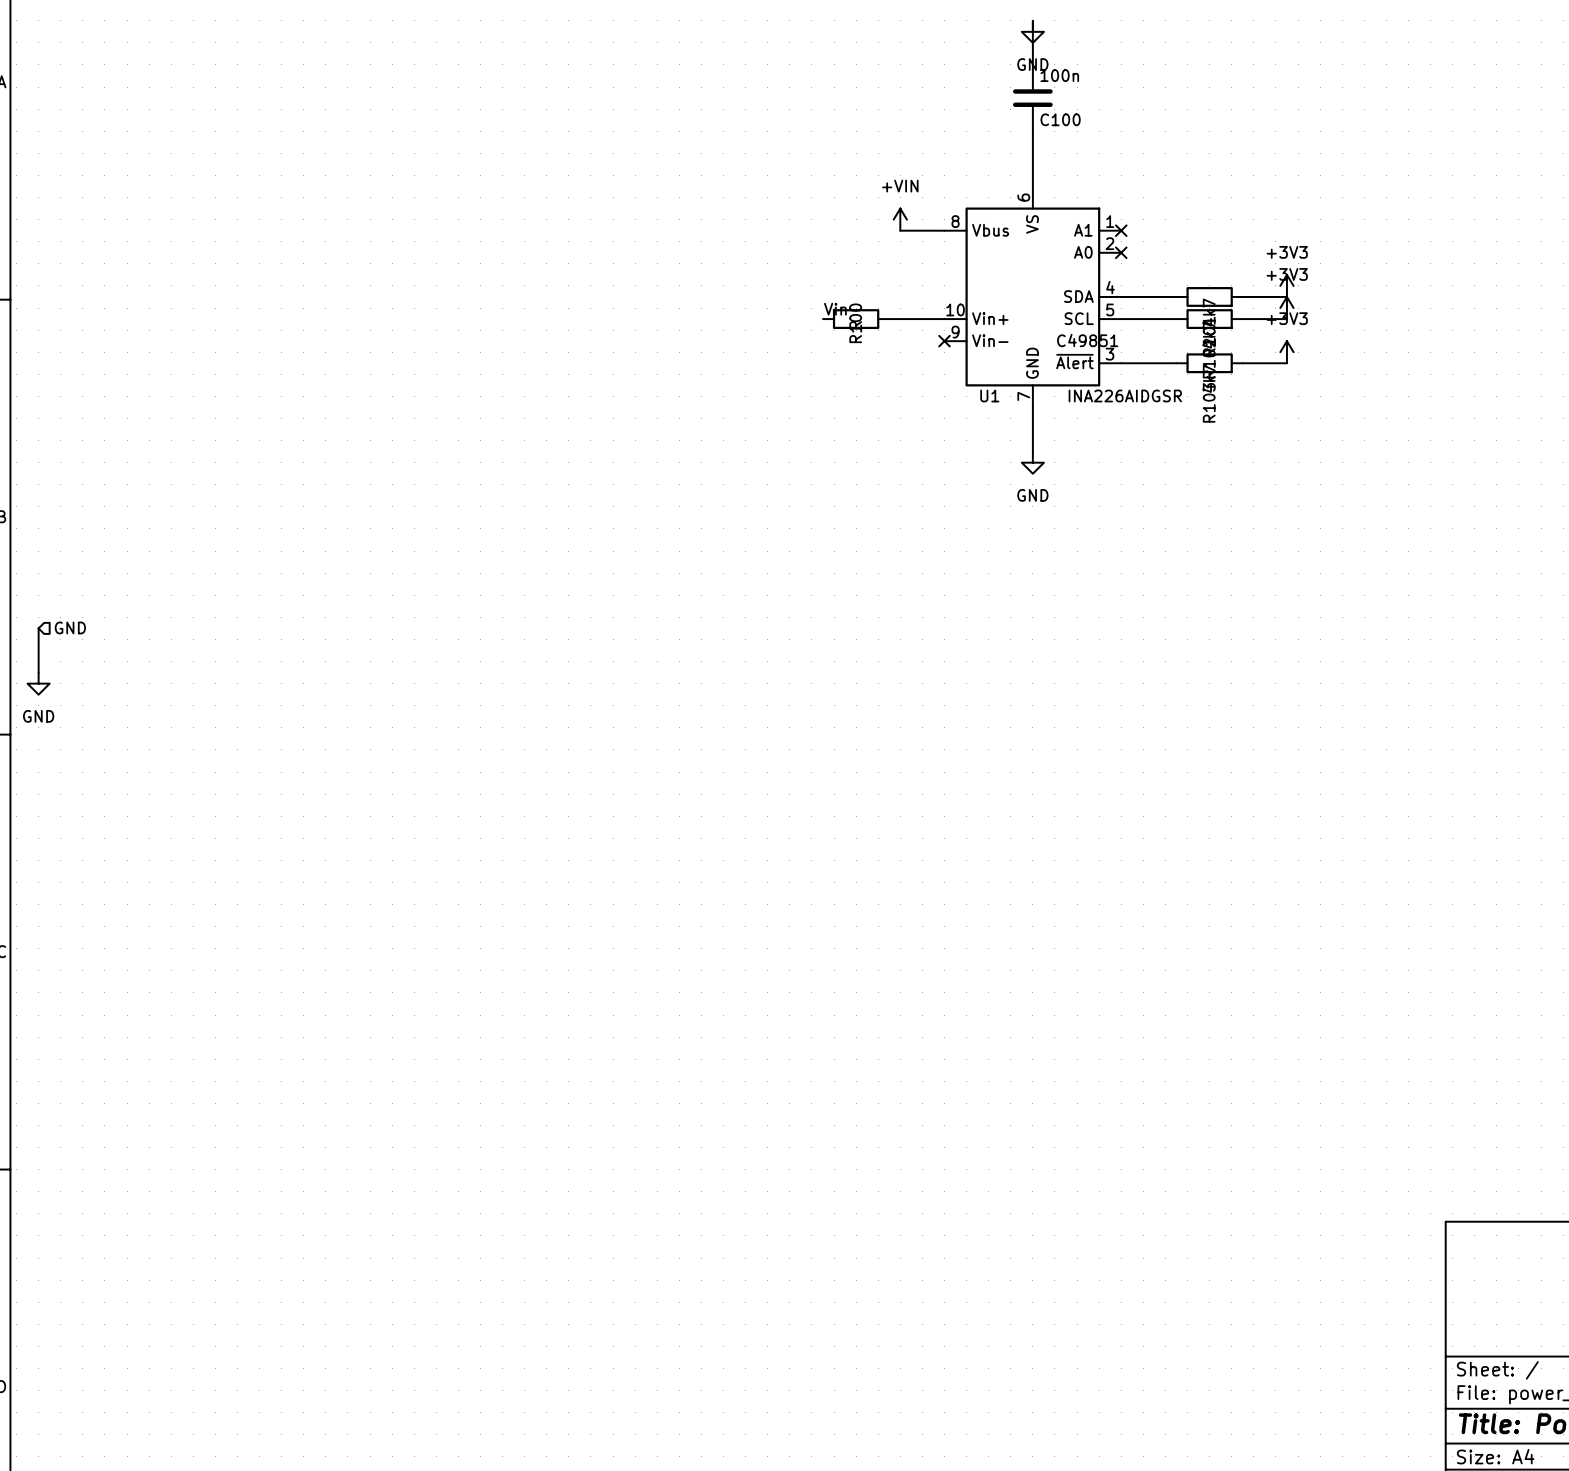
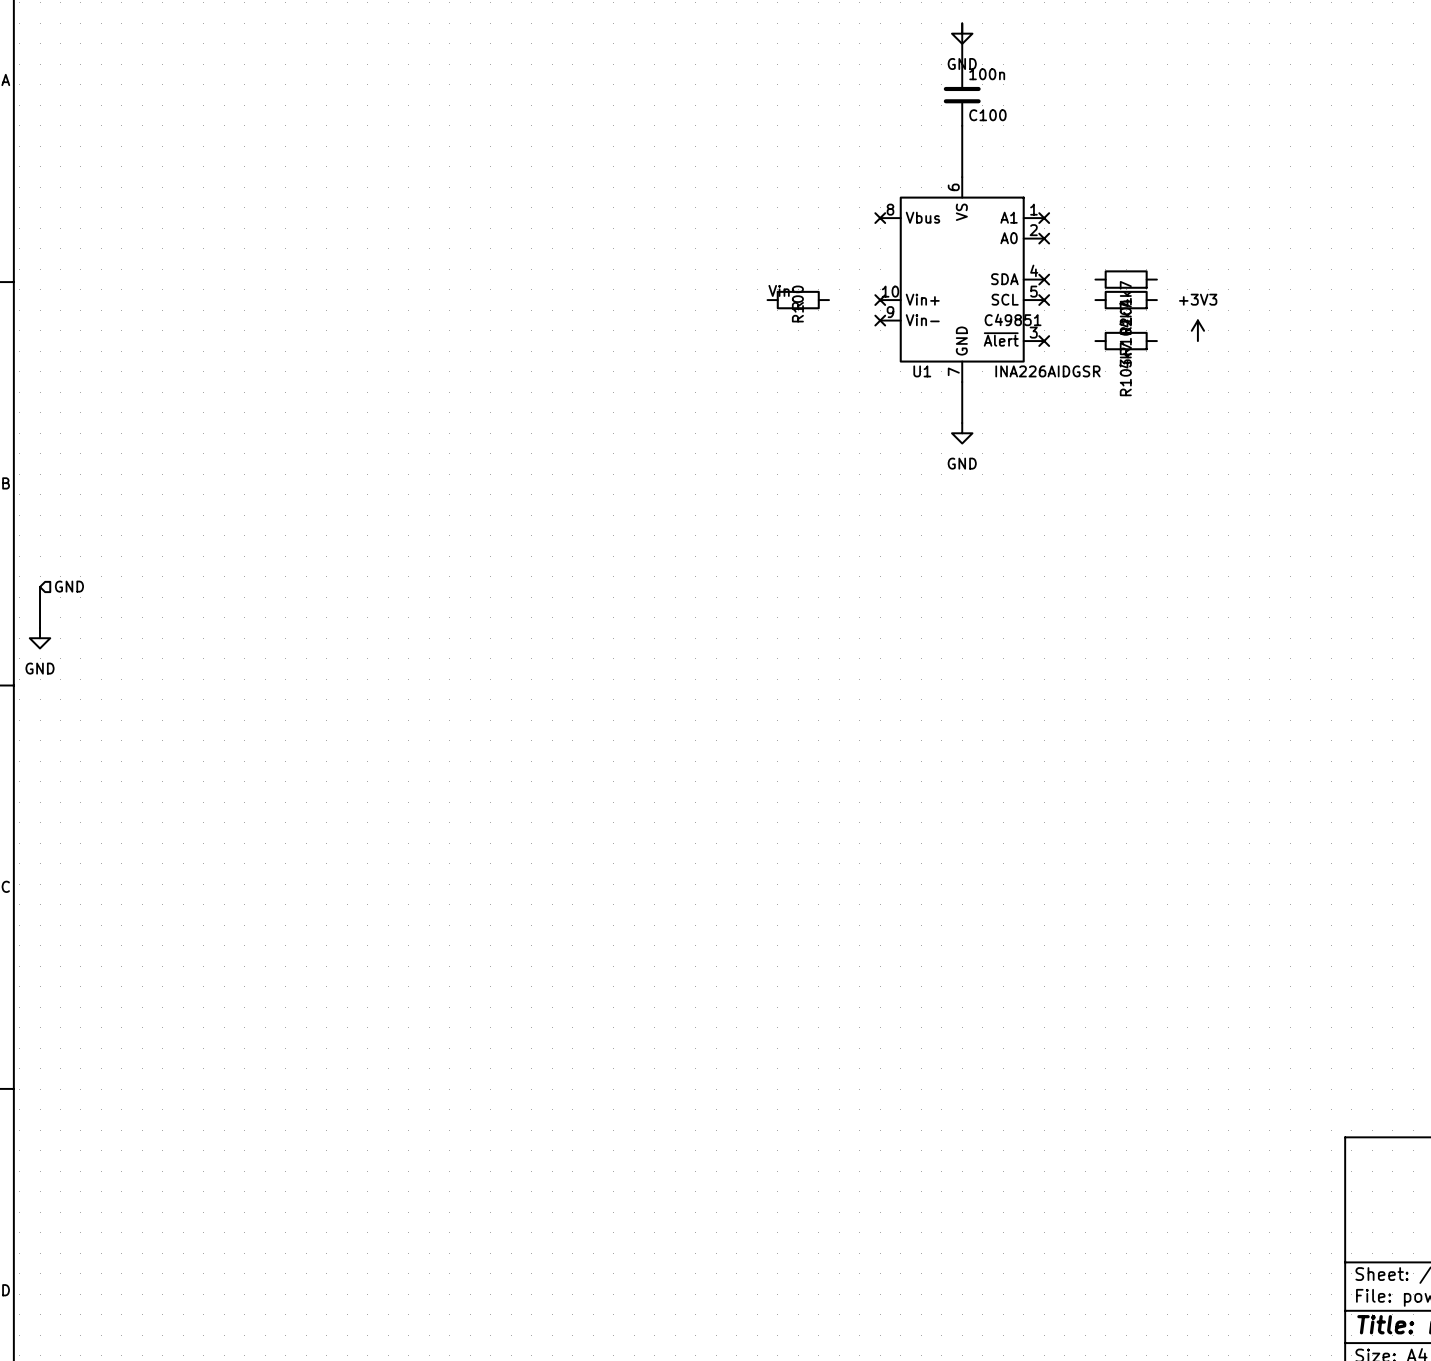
power symbol: +VIN (900, 219) -> none
wire: (900, 230) (944, 230) -> none
no-connect mark: none -> (880, 218)
power symbol: +3V3 (1286, 285) -> none
wire: (1121, 296) (1176, 296) -> none
no-connect mark: none -> (1044, 279)
wire: (1242, 296) (1286, 296) -> none
power symbol: +3V3 (1286, 308) -> none
wire: (889, 319) (944, 319) -> none
no-connect mark: none -> (880, 300)
wire: (1121, 319) (1176, 319) -> none
no-connect mark: none -> (1044, 300)
wire: (1242, 319) (1286, 319) -> none
wire: (1121, 363) (1176, 363) -> none
no-connect mark: none -> (1044, 341)
wire: (1242, 363) (1286, 363) -> none

